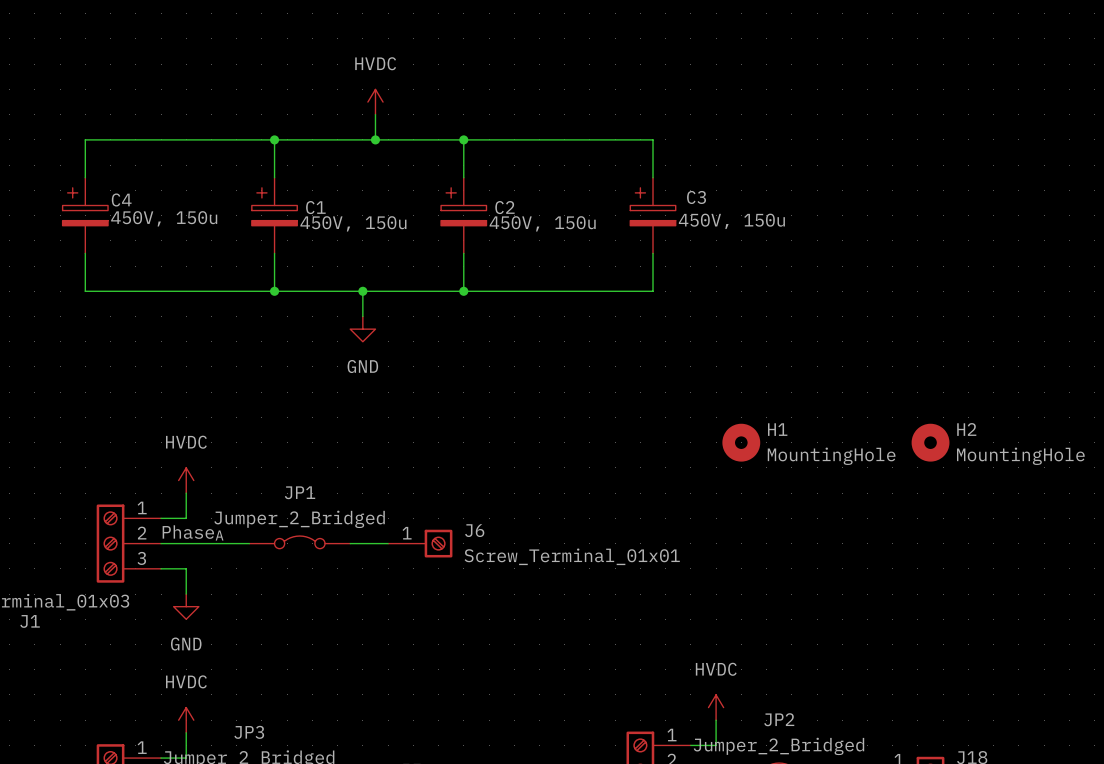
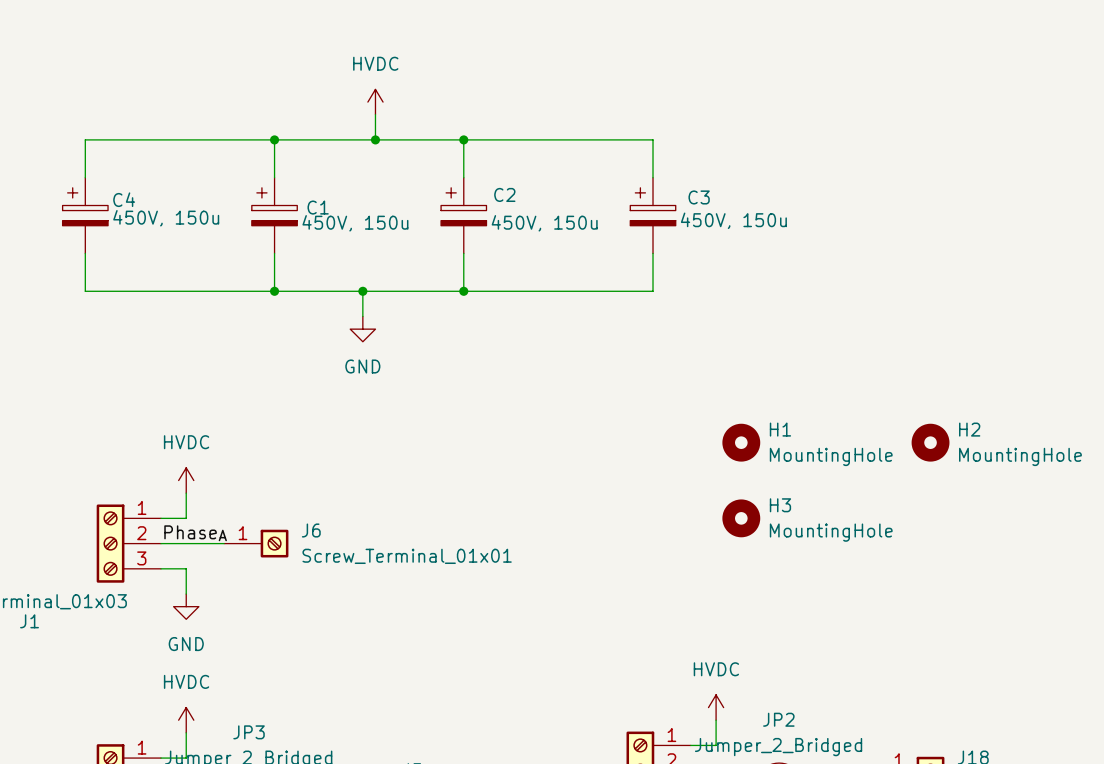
C2 name position: C2 (504, 207) -> C2 (504, 194)
H3: none -> MountingHole (741, 518)
JP1: Jumper_2_Bridged (299, 542) -> none
wire: (350, 543) (388, 543) -> none
J6 position: (420, 543) -> (256, 543)

